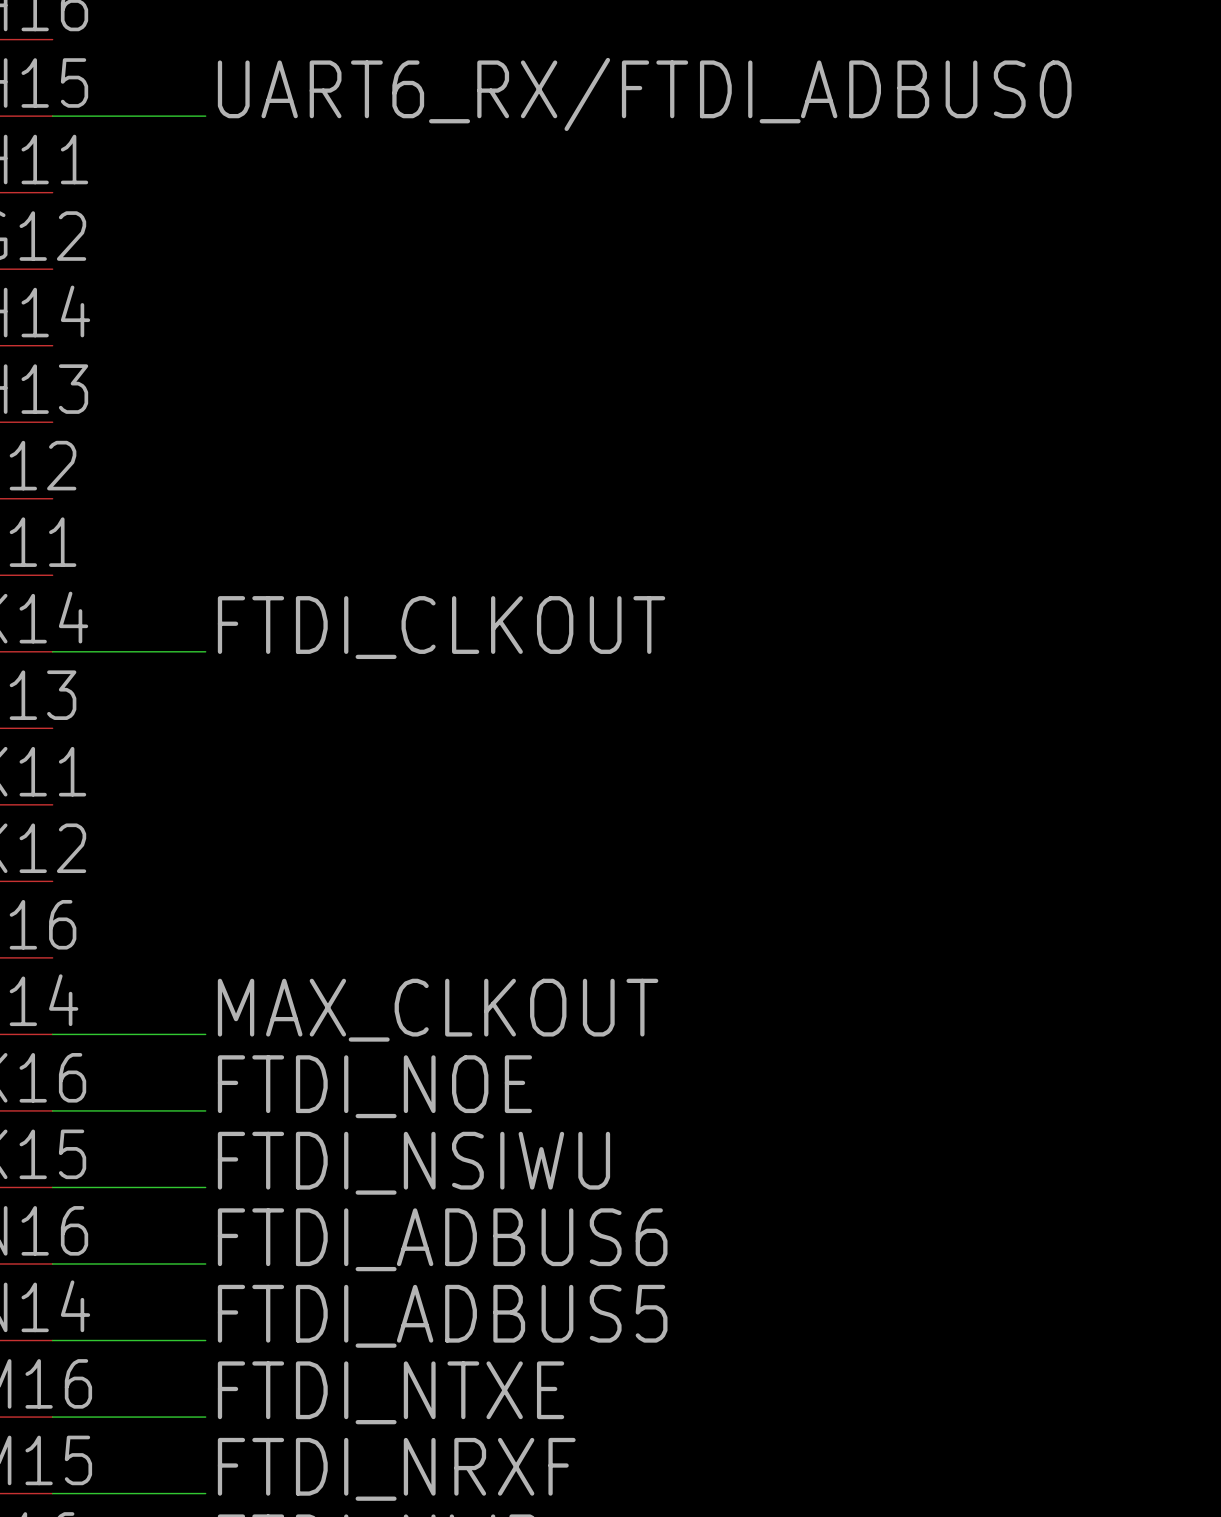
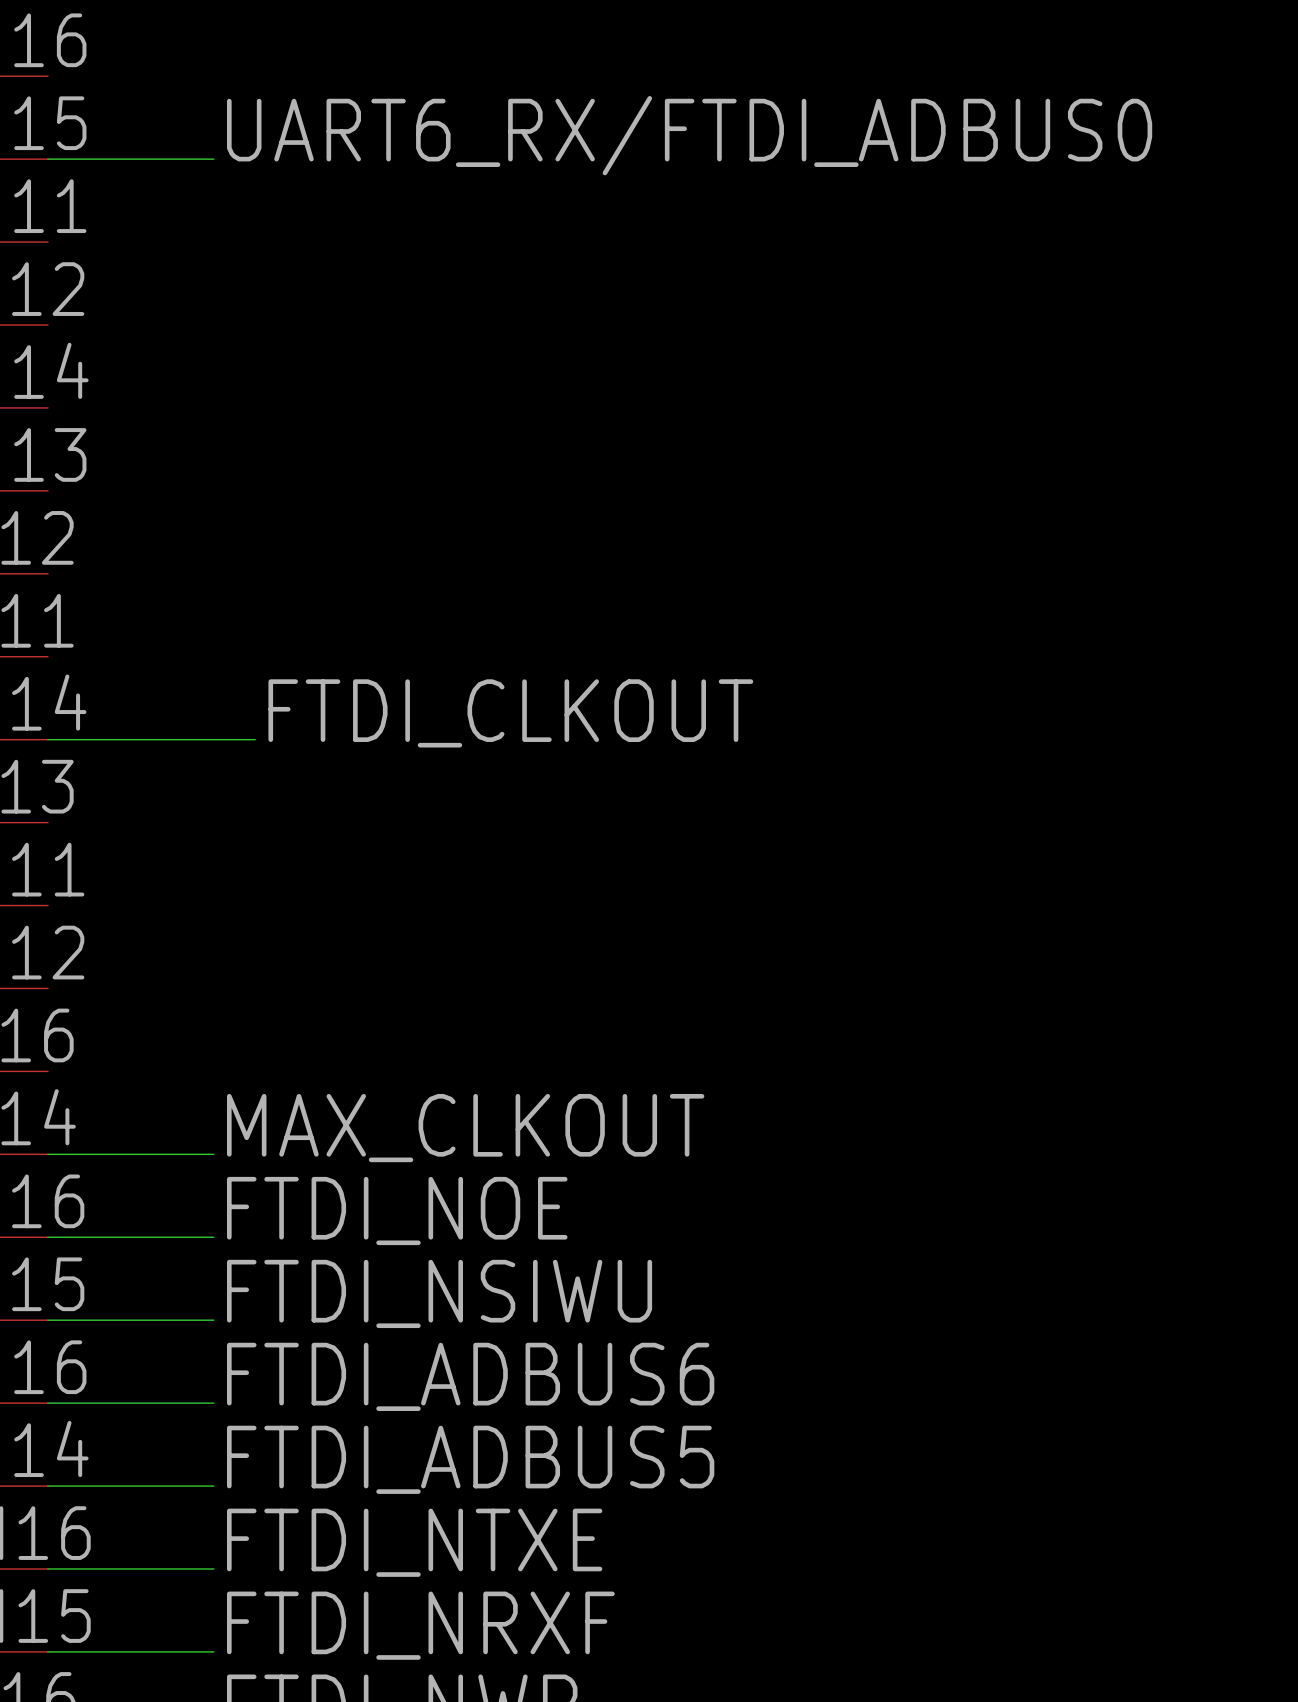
label position: FTDI_CLKOUT (441, 627) -> FTDI_CLKOUT (510, 713)
wire: none -> (213, 739) (255, 739)

